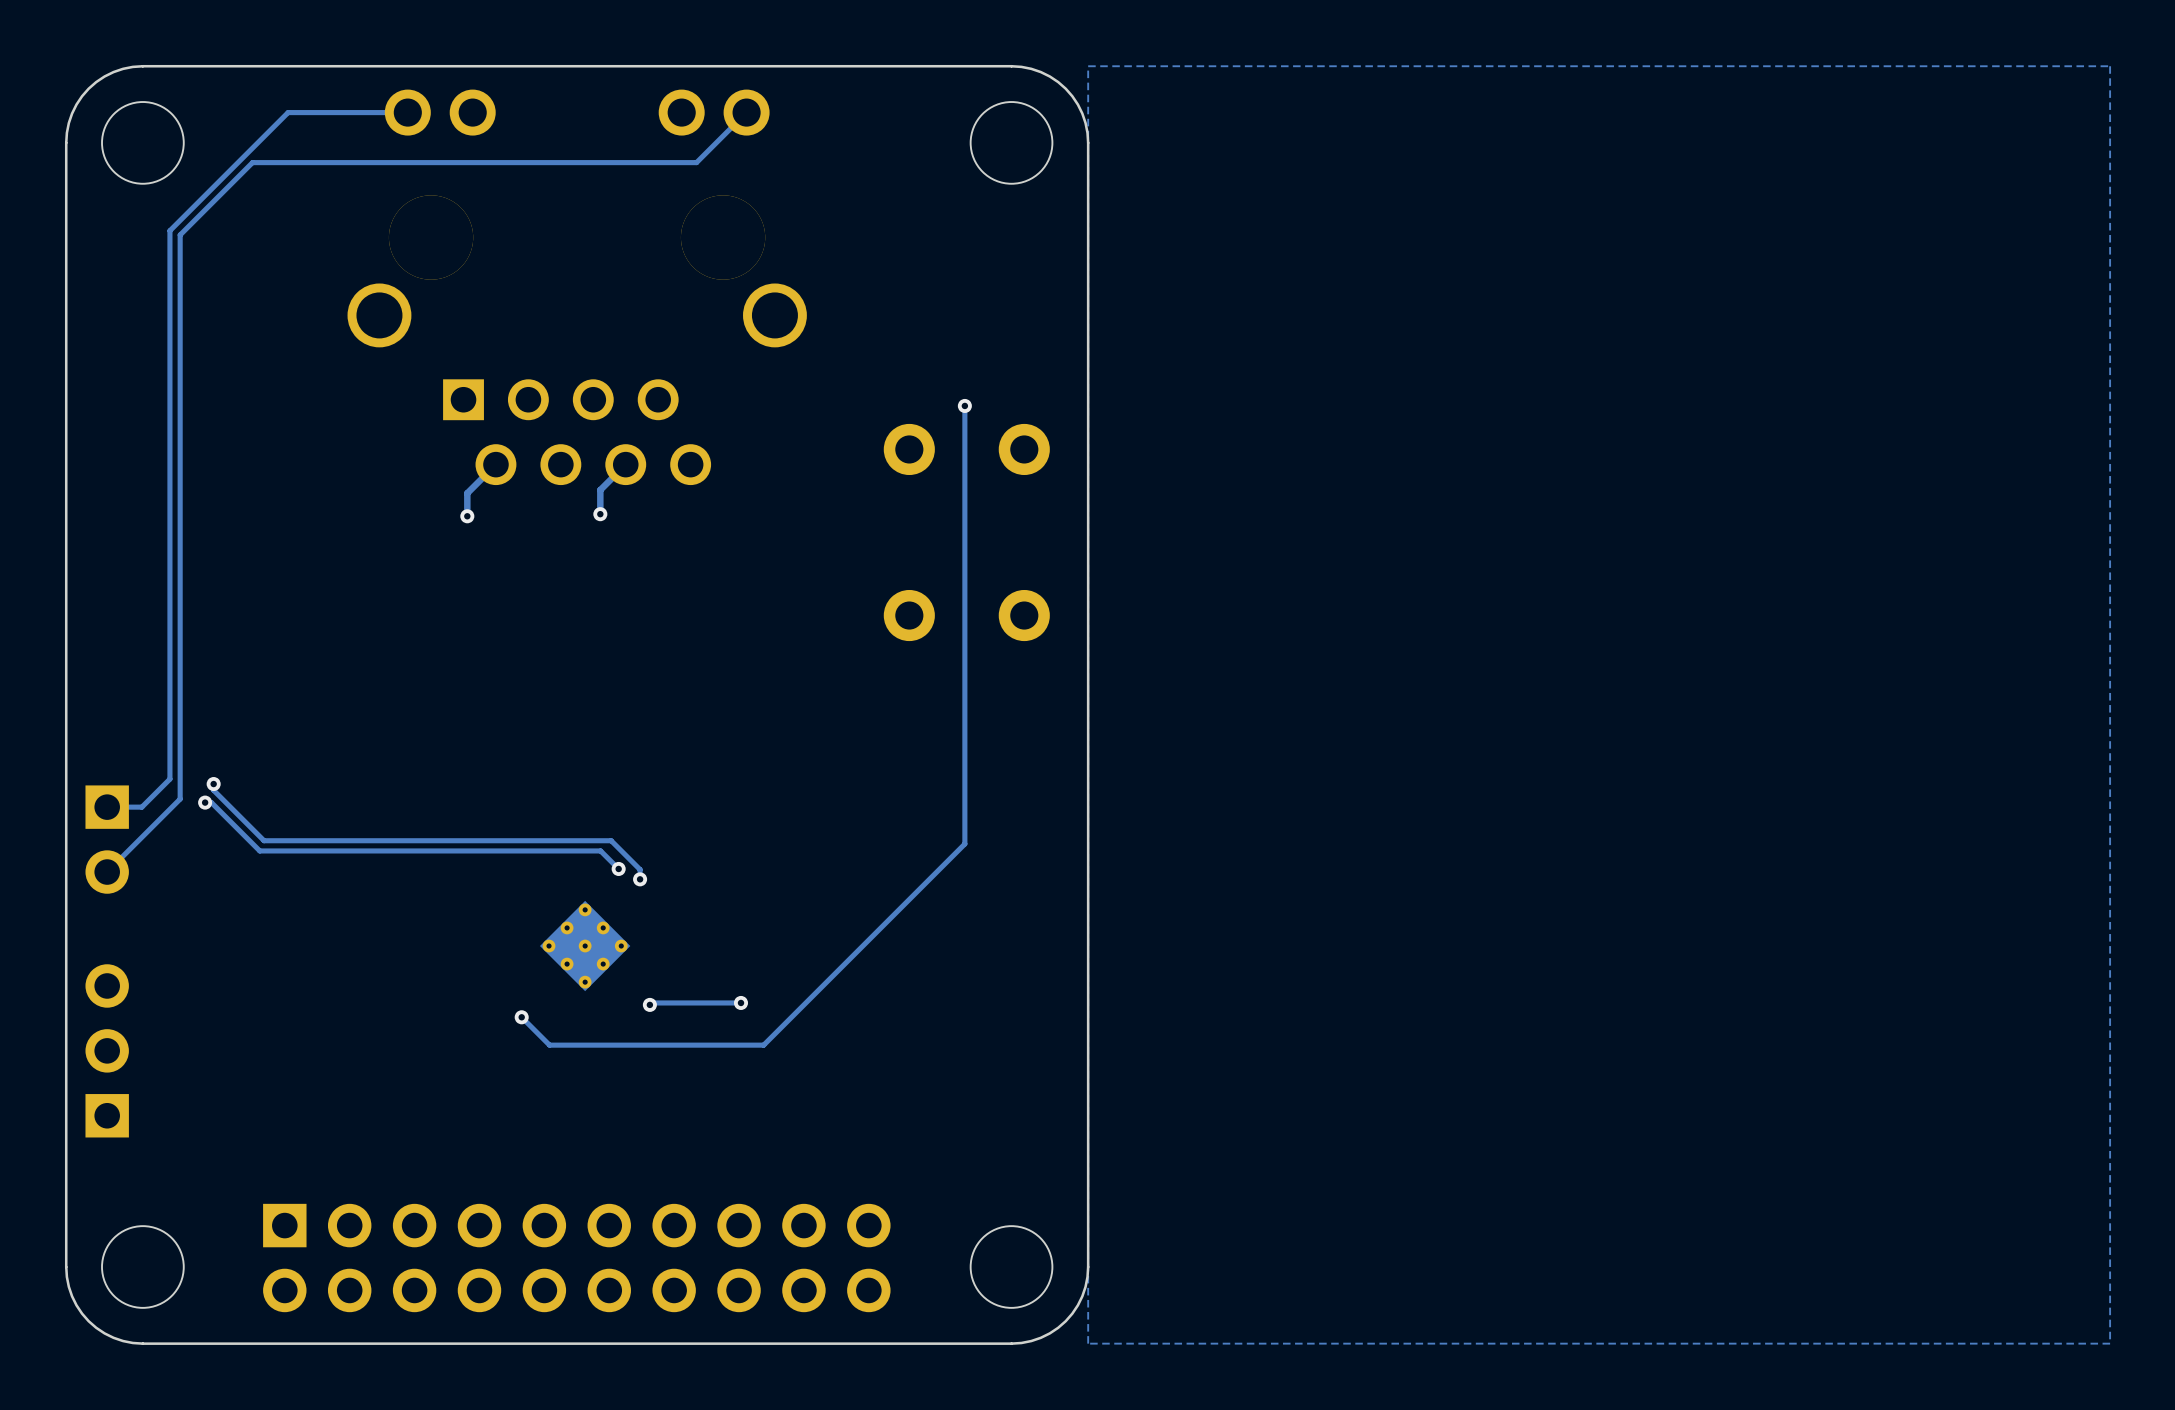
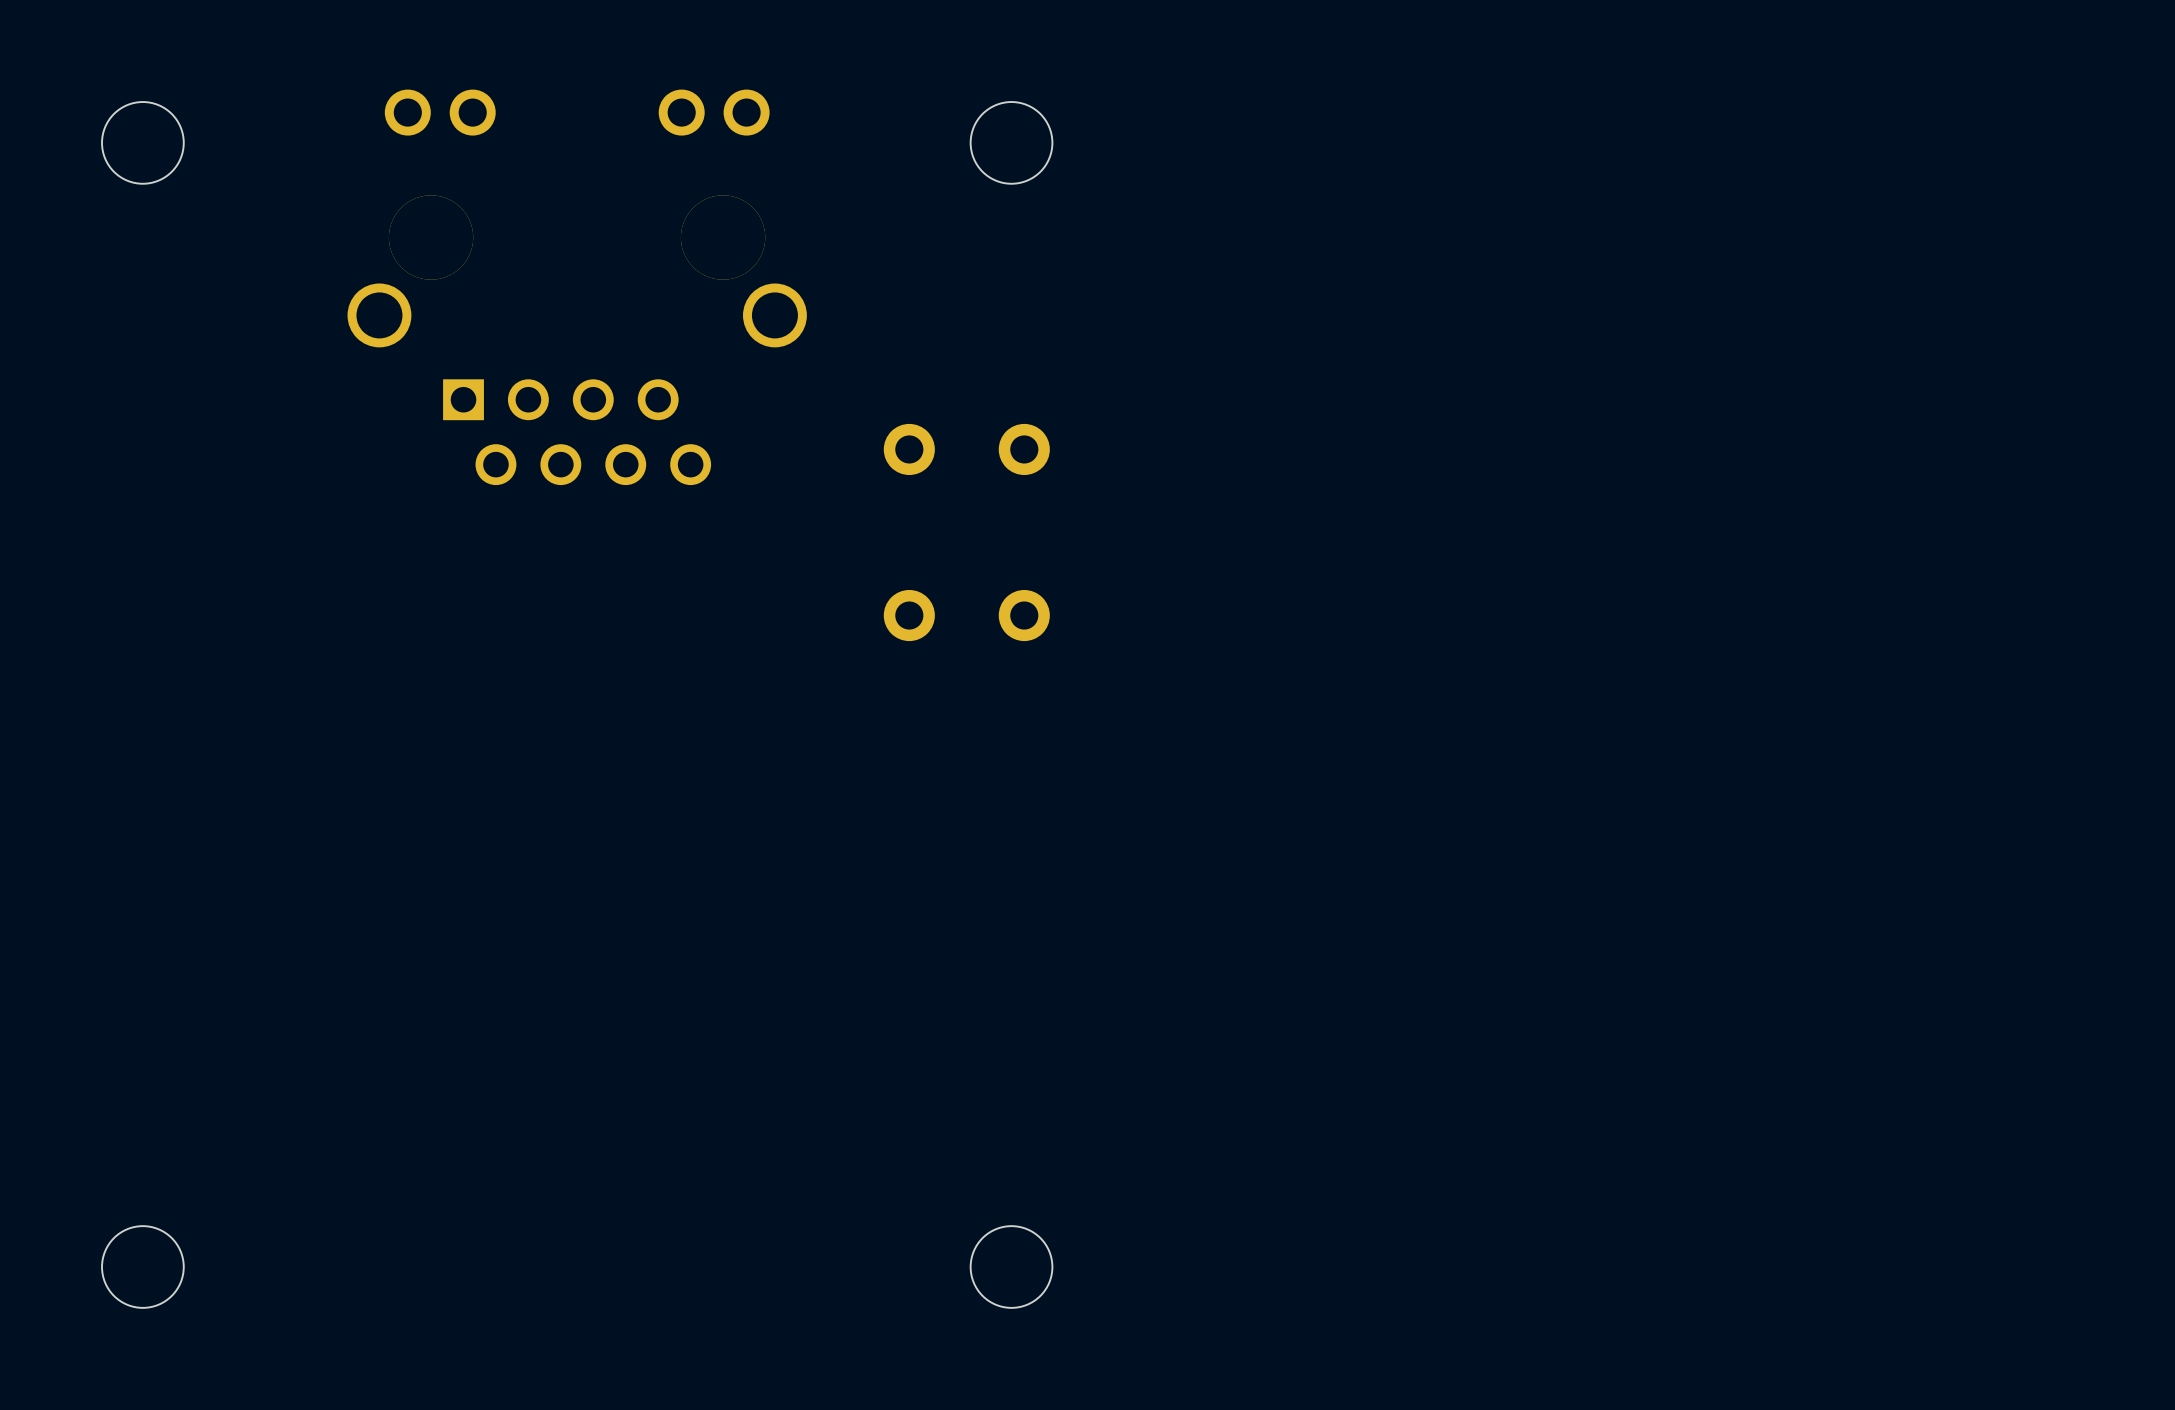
board edge: (1011, 66) (142, 66) (113, 72) (96, 82) (82, 96) (72, 113) (66, 142) (66, 1267) (68, 1286) (76, 1305) (96, 1327) (113, 1337) (142, 1343) (1011, 1343) (1040, 1337) (1058, 1327) (1072, 1313) (1085, 1286) (1088, 1267) (1088, 142) (1082, 113) (1065, 88) (1040, 72) (1011, 66) -> none
zone outline: (2110, 66) (1088, 66) (1088, 1343) (2110, 1343) (2110, 66) -> none
track: (407, 112) (288, 112) (169, 230) (169, 779) (141, 807) (107, 807) -> none
track: (746, 112) (696, 162) (252, 162) (180, 234) (180, 799) (107, 872) -> none
track: (964, 405) (964, 843) (763, 1045) (549, 1045) (521, 1017) -> none
via: (964, 405) -> none
track: (495, 464) (467, 493) (467, 516) -> none
track: (625, 464) (600, 490) (600, 514) -> none
via: (600, 514) -> none
via: (467, 516) -> none
track: (213, 784) (213, 790) (264, 840) (611, 840) (640, 869) (640, 879) -> none
via: (213, 784) -> none
track: (205, 802) (211, 802) (259, 850) (600, 850) (618, 868) -> none
via: (205, 802) -> none
part: (107, 839) -> none
via: (618, 868) -> none
via: (640, 879) -> none
part: (585, 946) -> none
track: (740, 1002) (651, 1002) (649, 1004) -> none
via: (740, 1002) -> none
via: (649, 1004) -> none
via: (521, 1017) -> none
part: (107, 1050) -> none
part: (576, 1258) -> none

